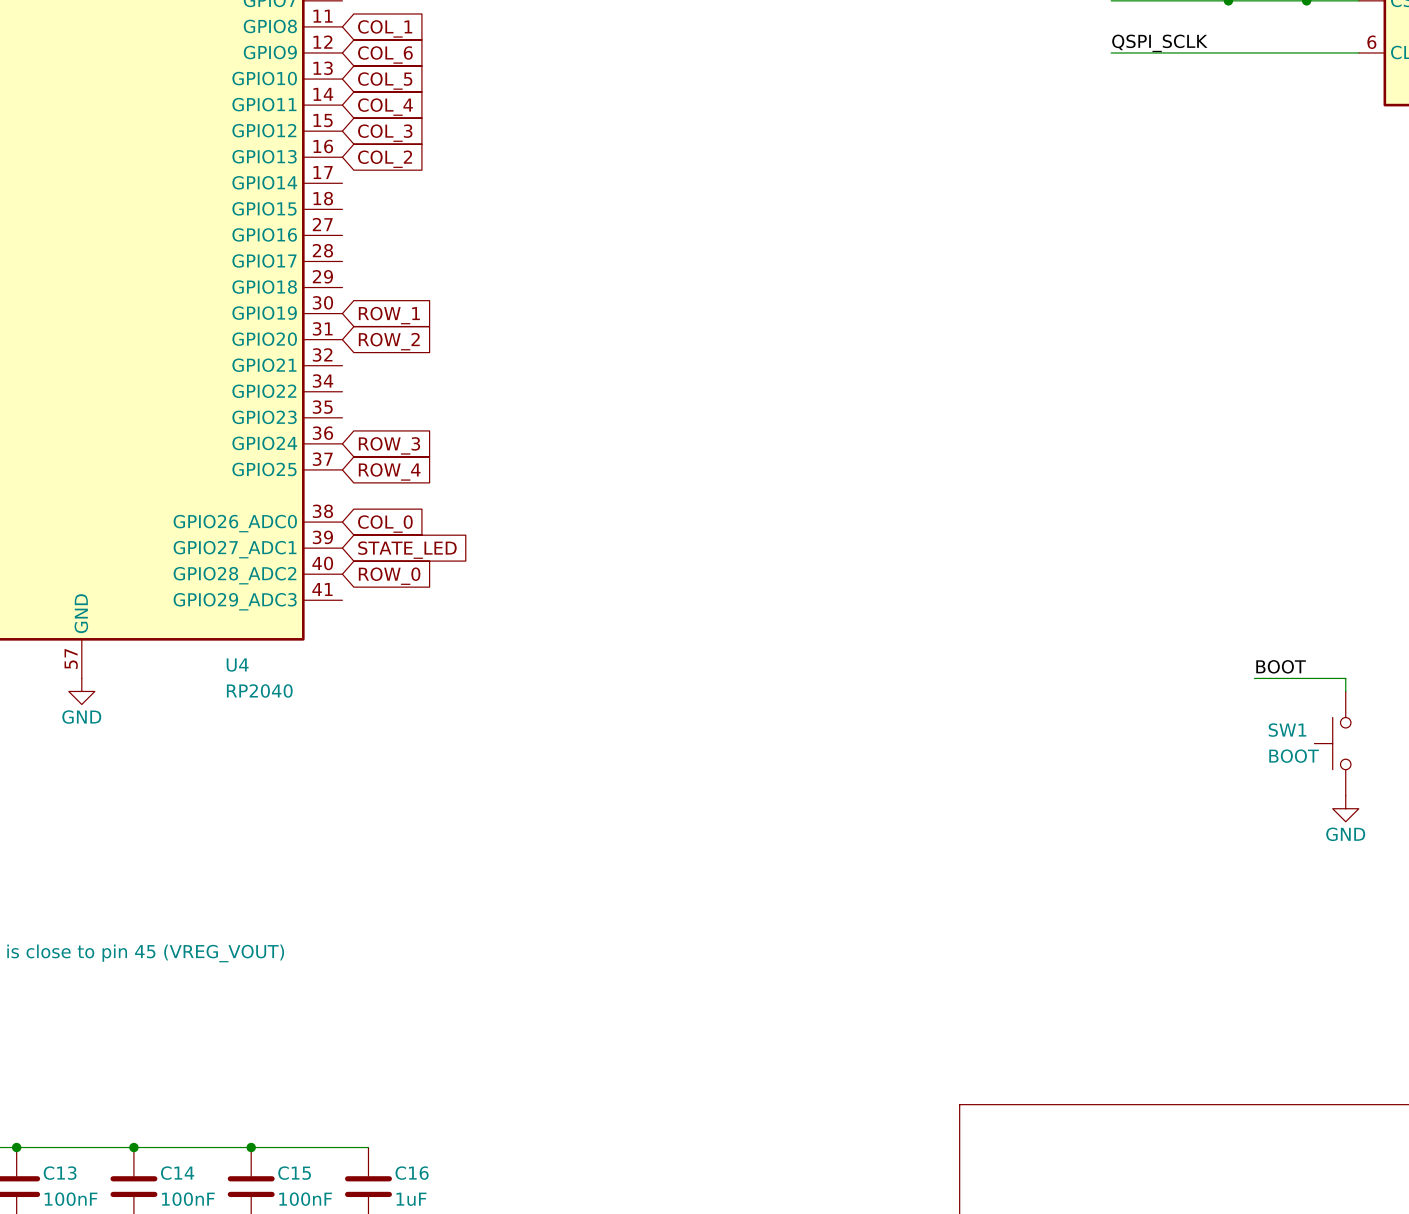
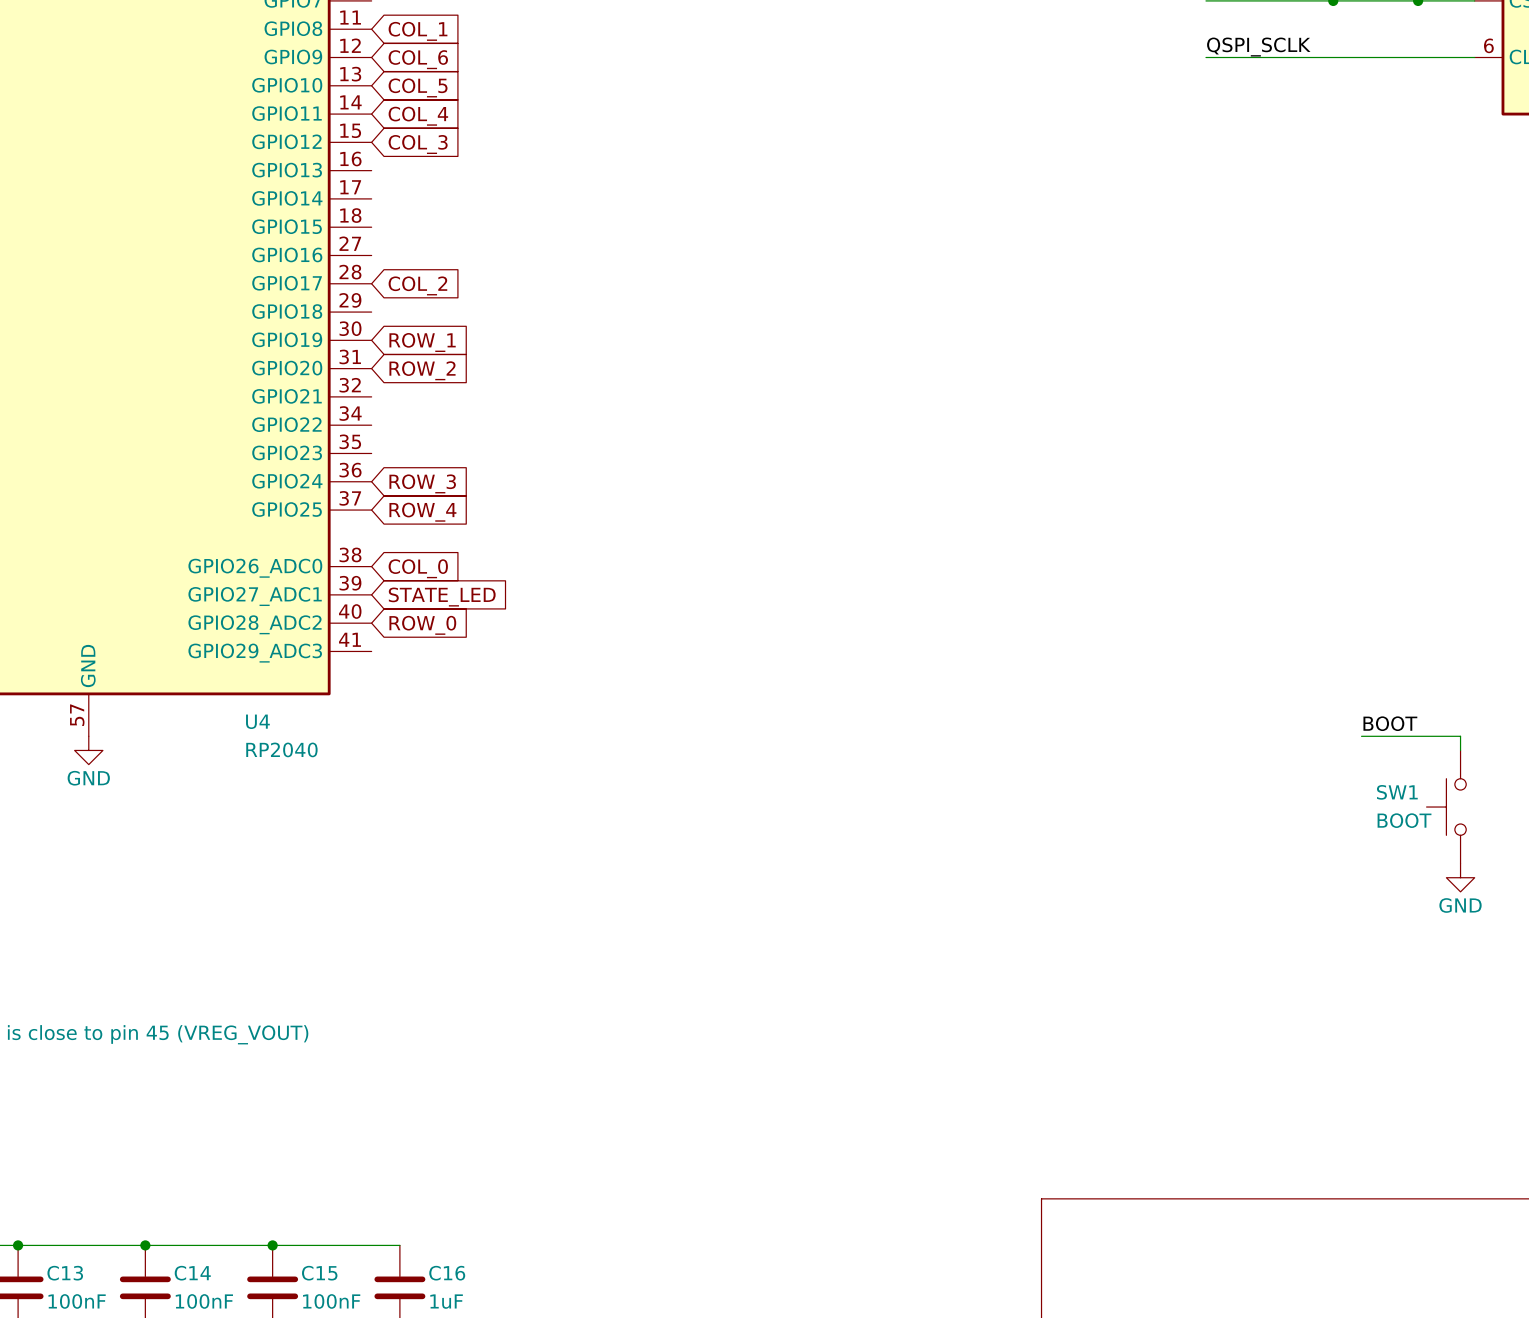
global label position: COL_2 (385, 159) -> COL_2 (417, 285)

